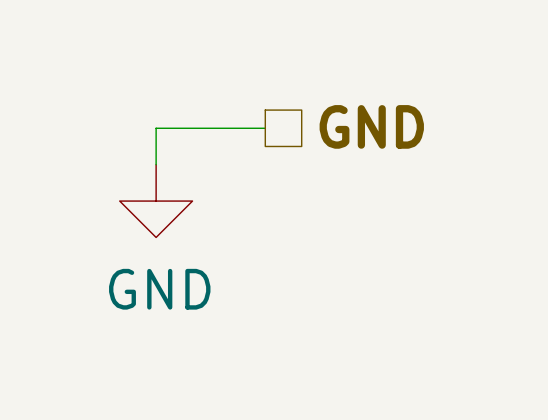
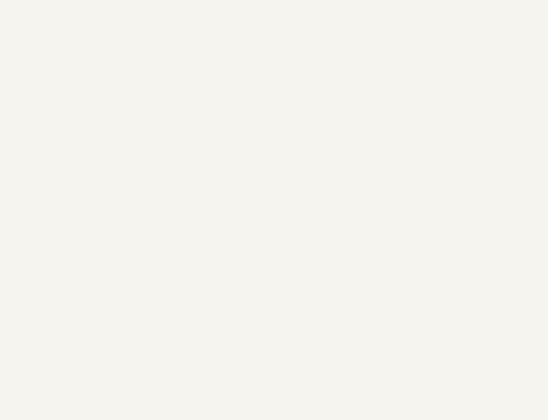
hierarchical label: GND (371, 126) -> none
wire: (265, 128) (156, 128) (156, 164) -> none
power symbol: GND (156, 201) -> none

